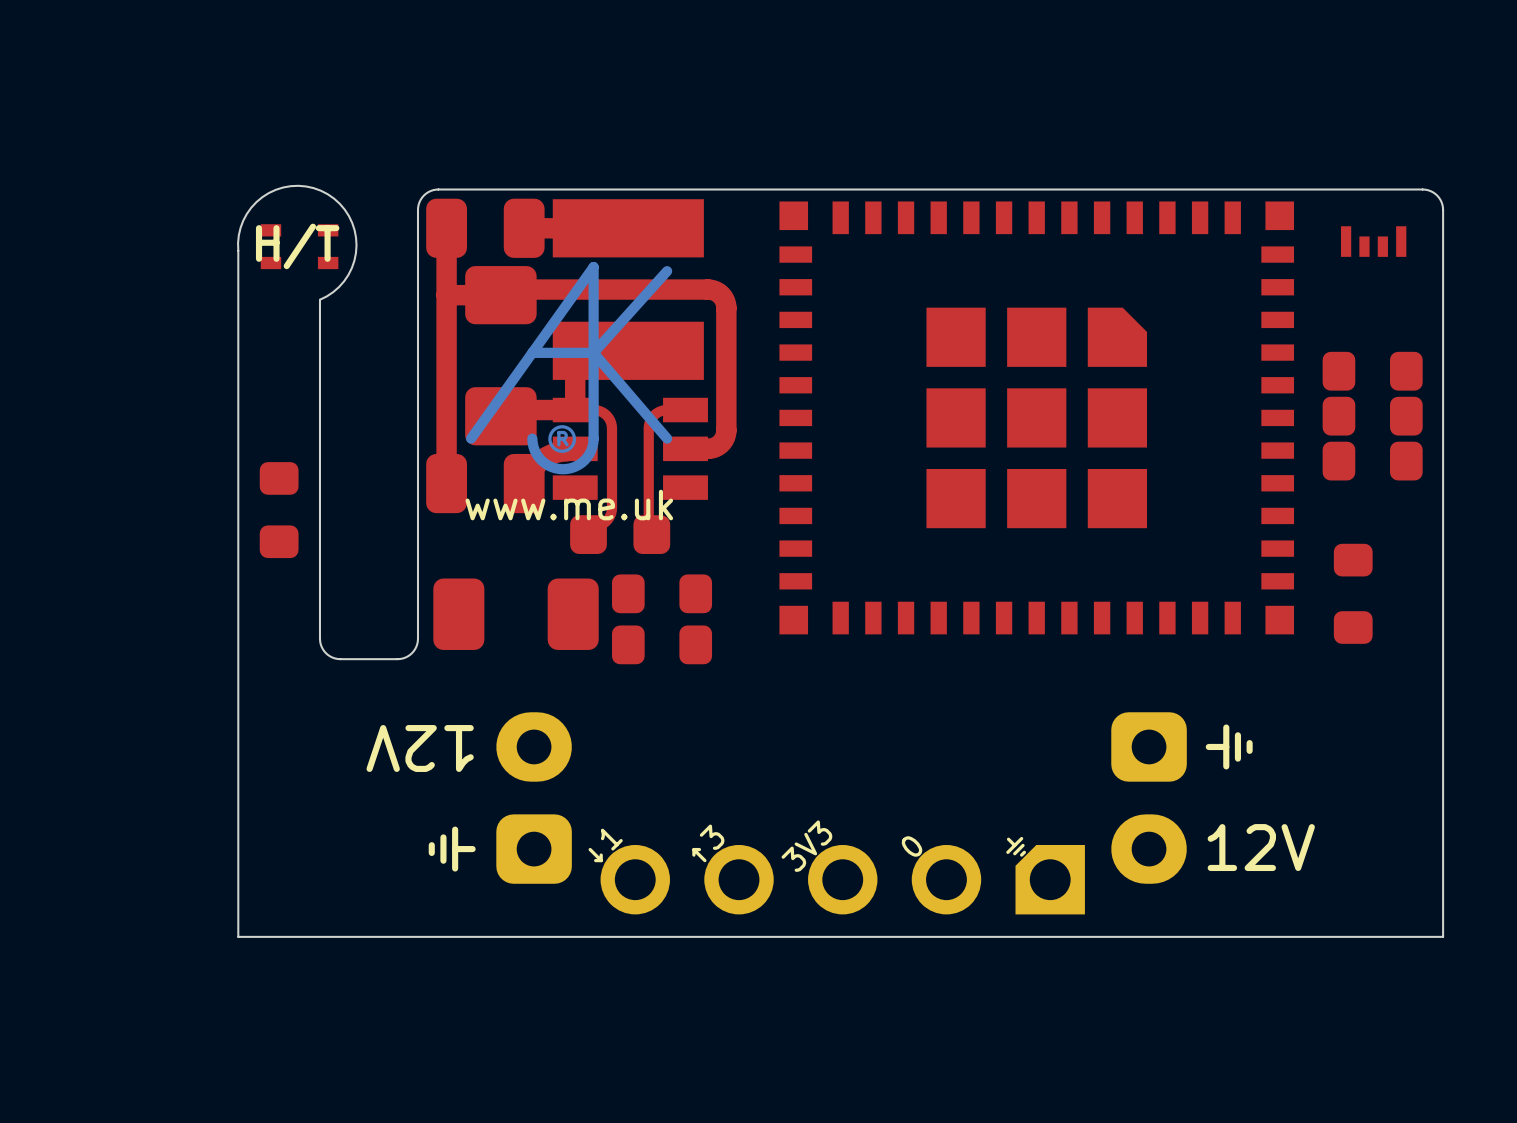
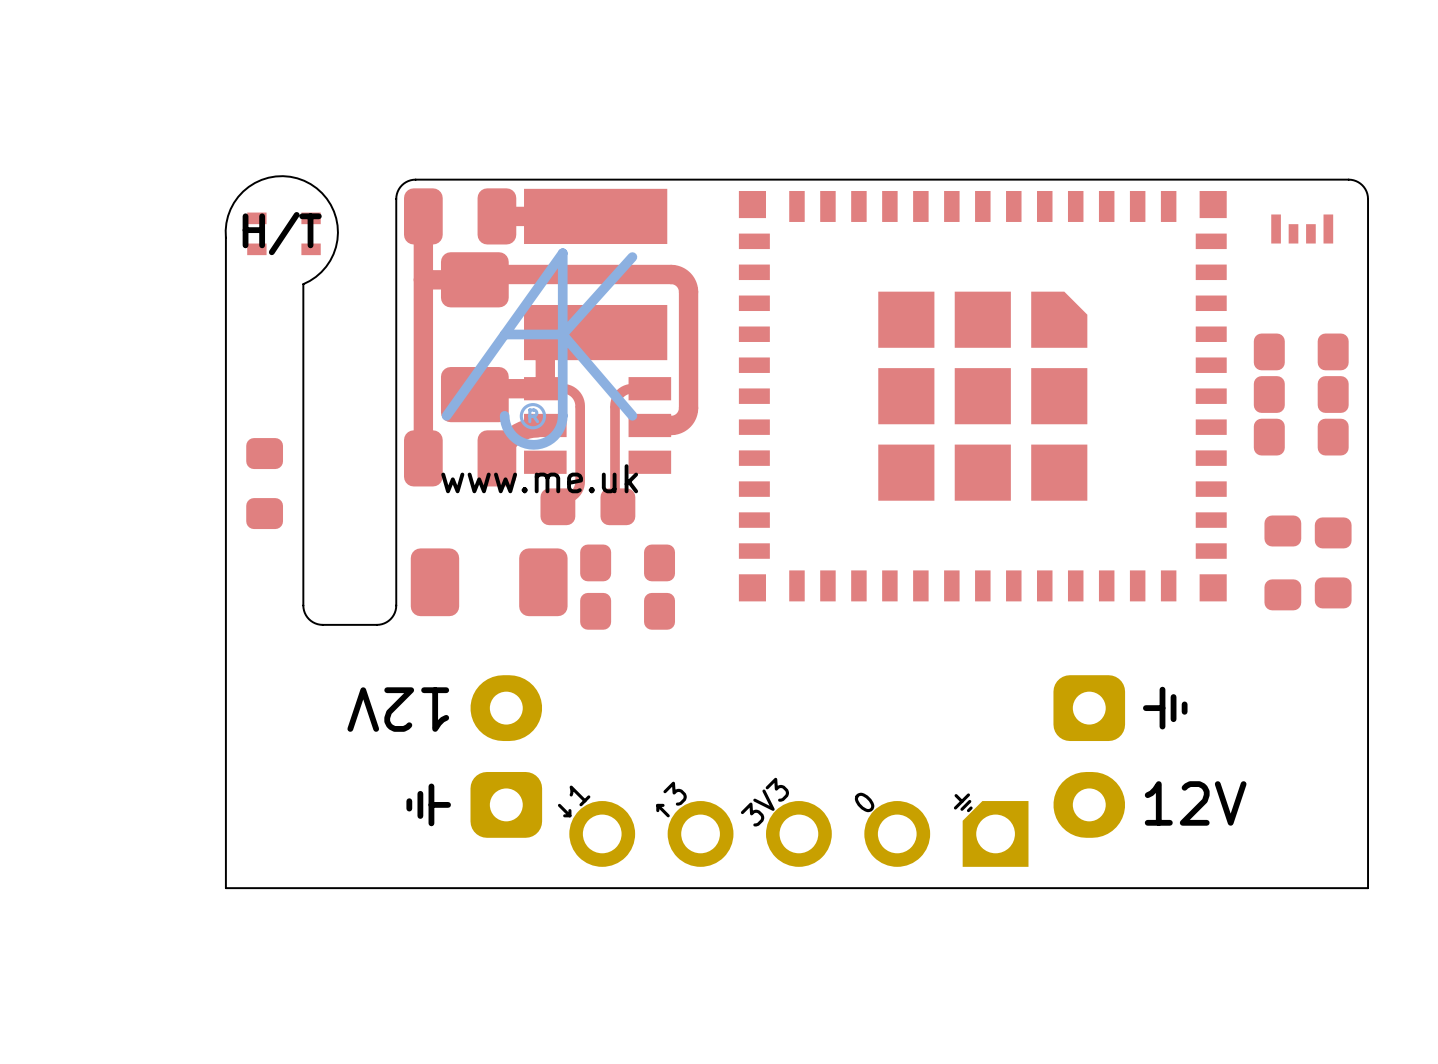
part: none -> (1333, 562)

